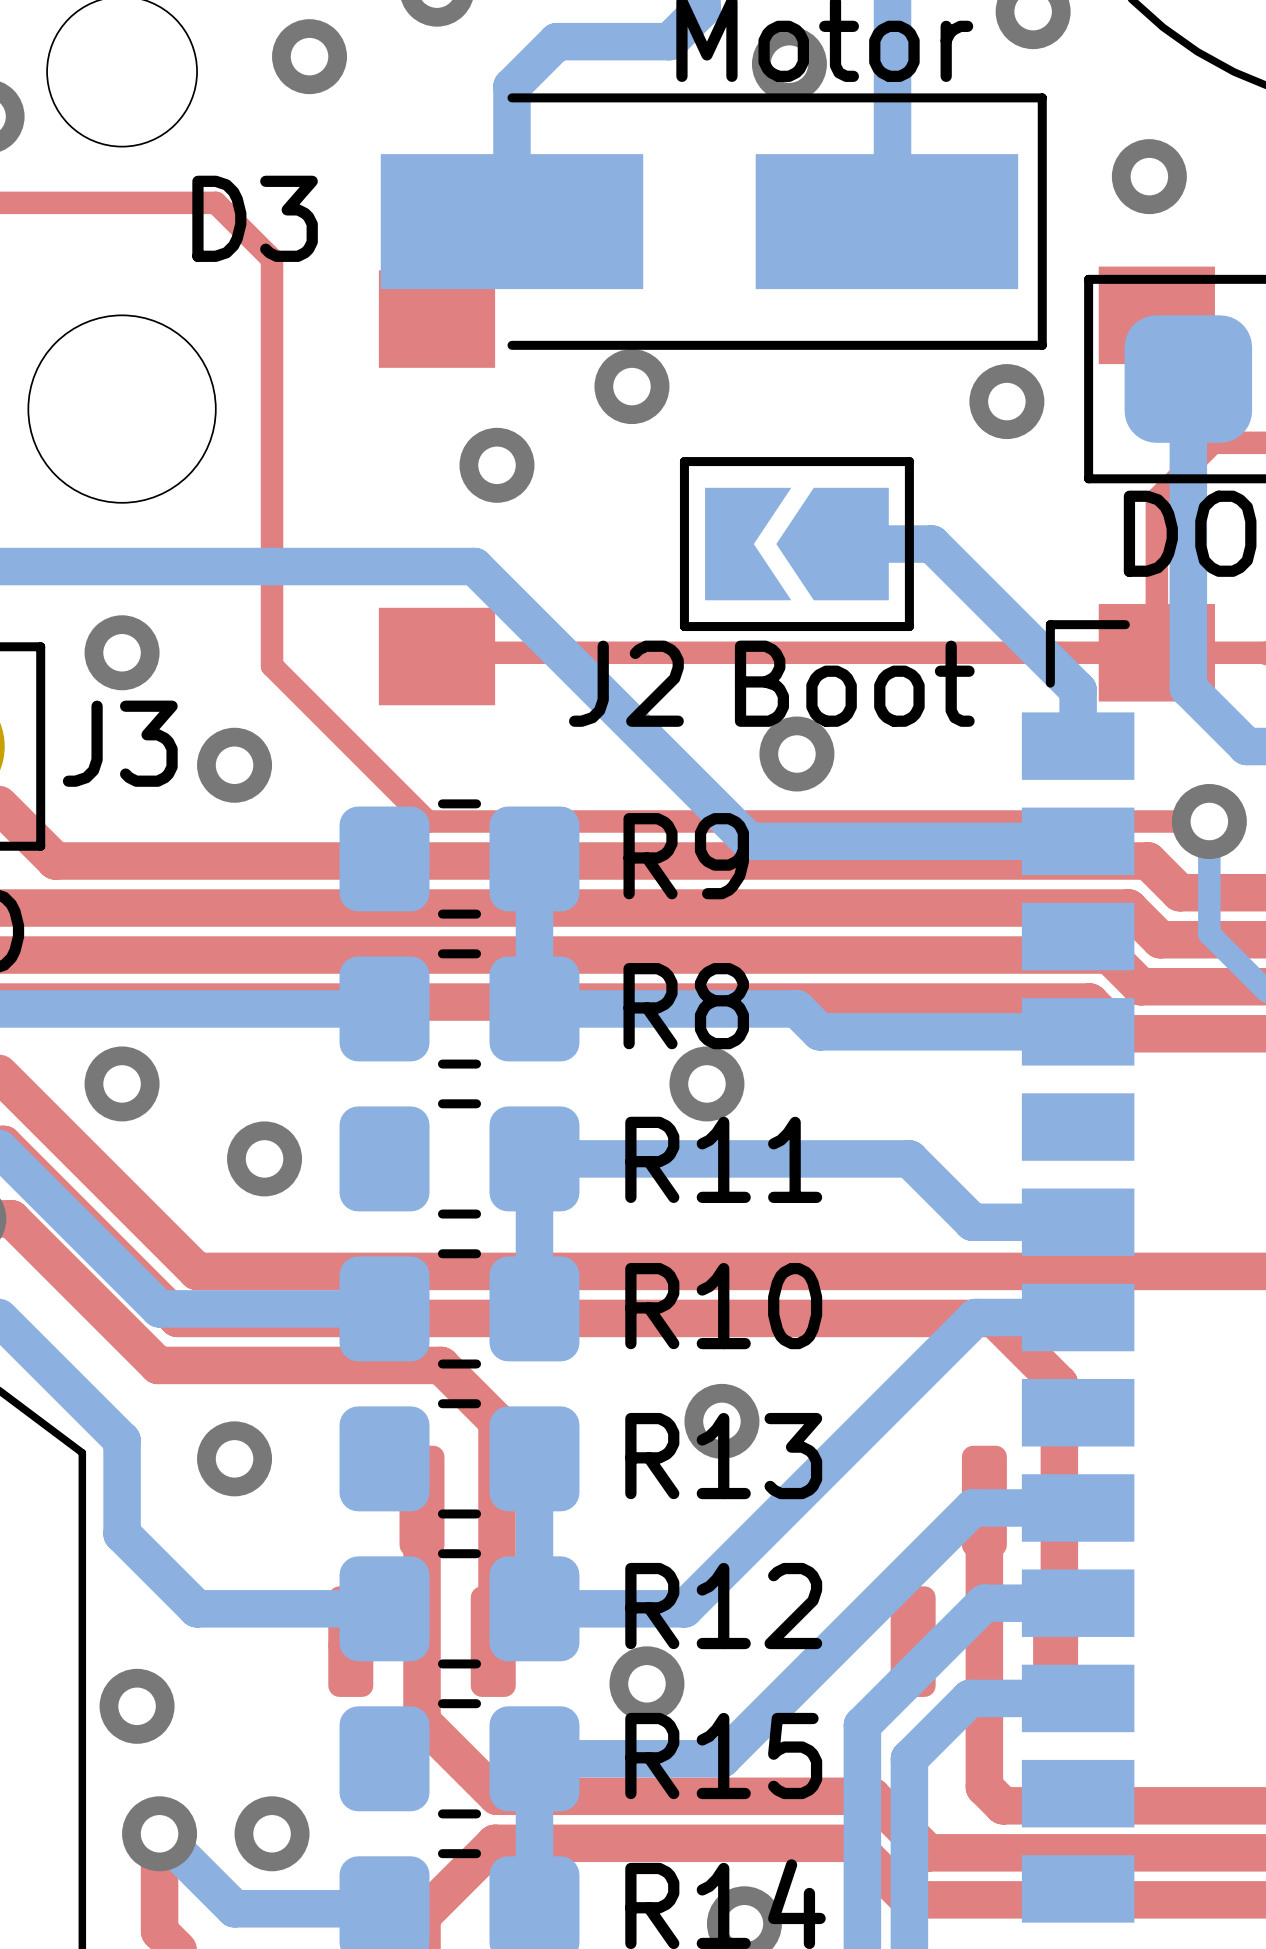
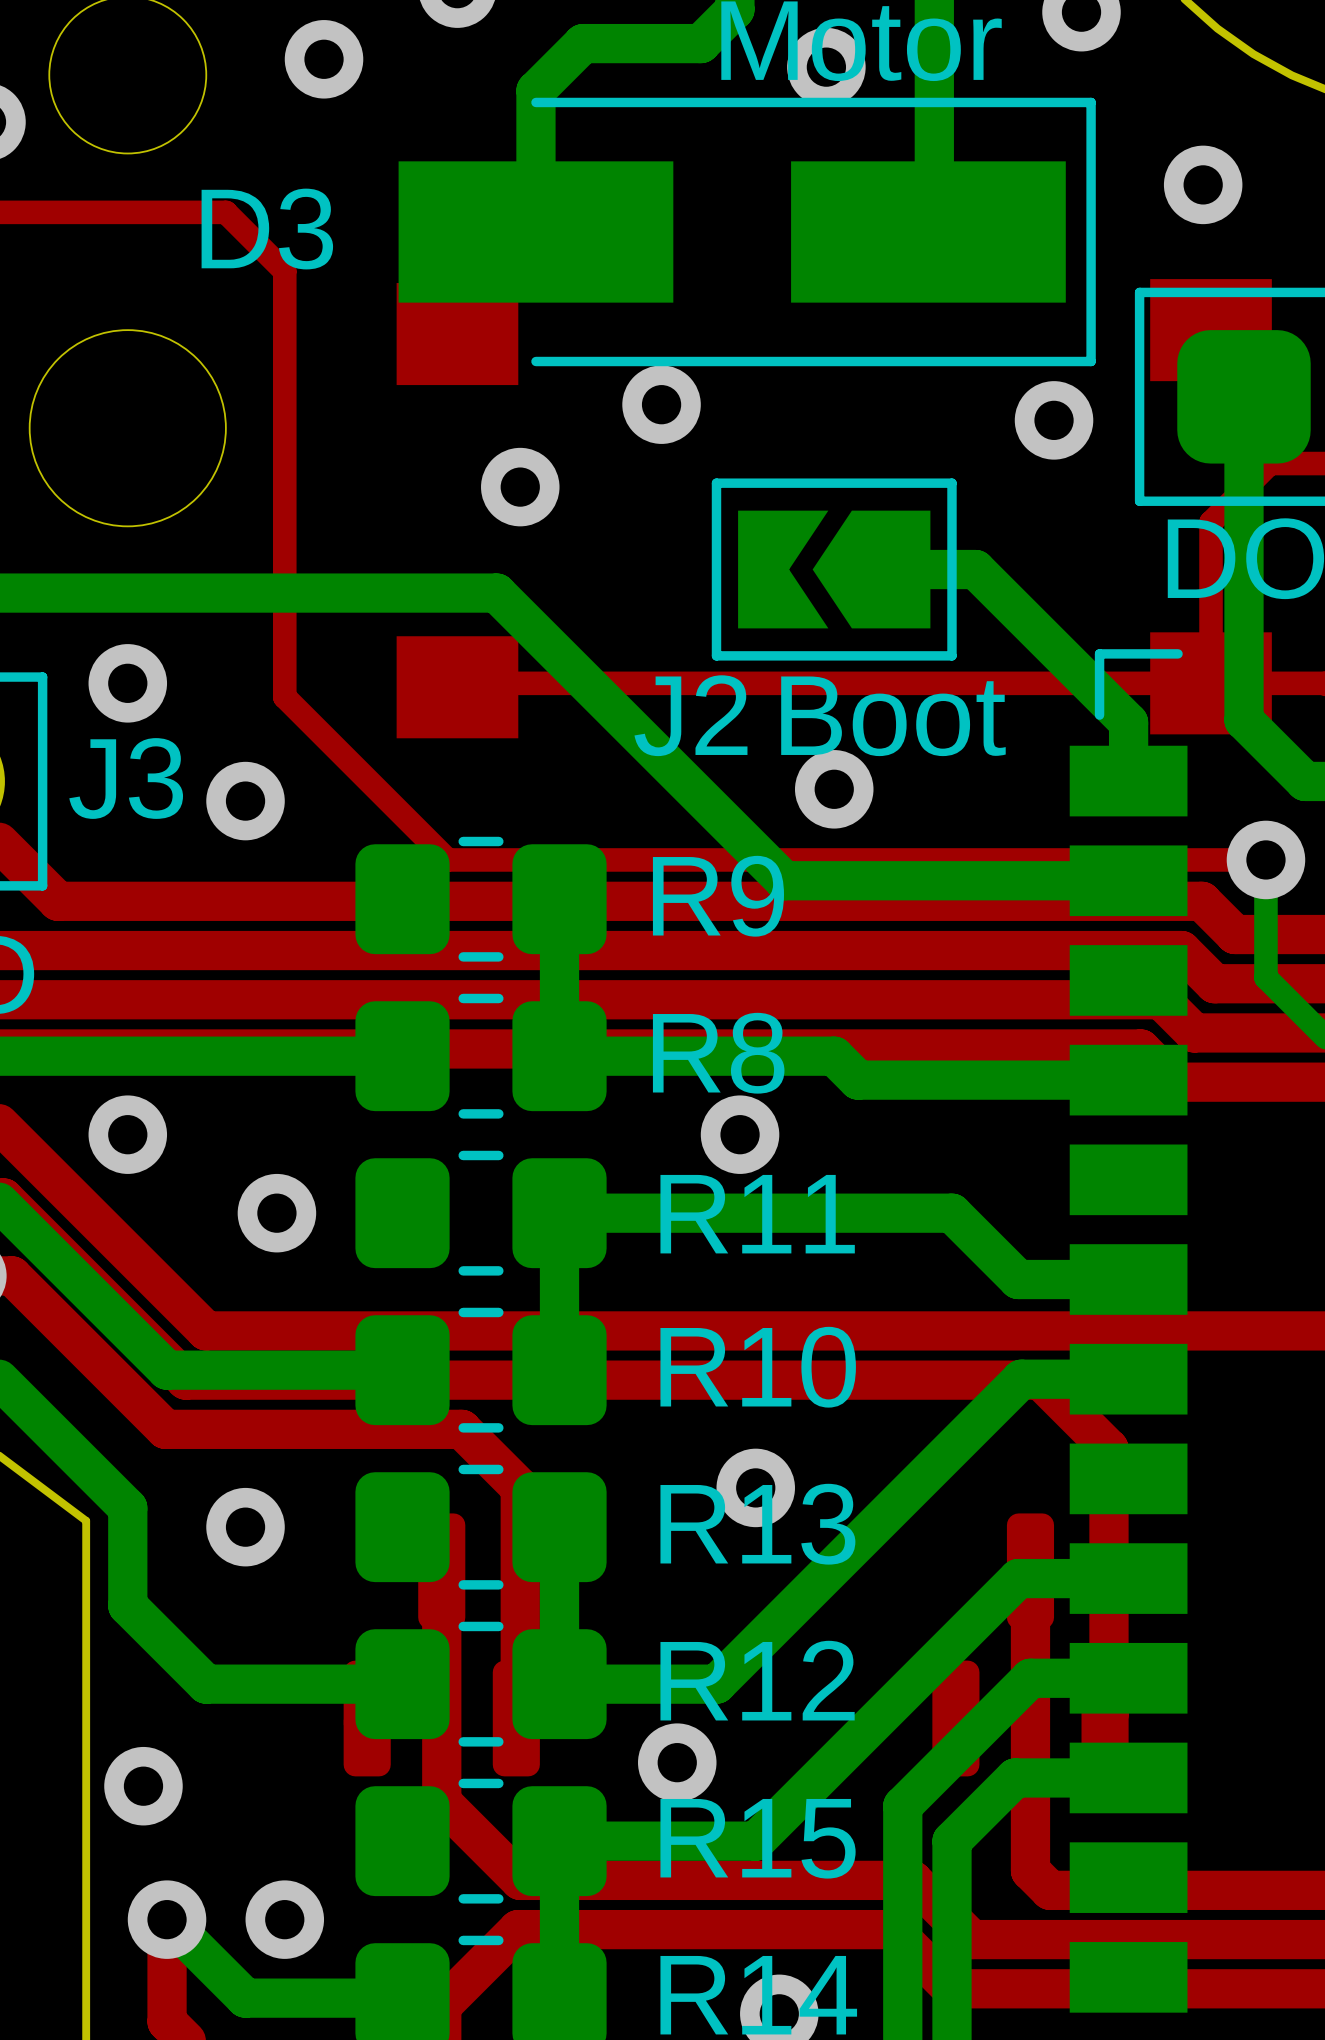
J2 name position: J2 (626, 683) -> J2 (690, 715)

